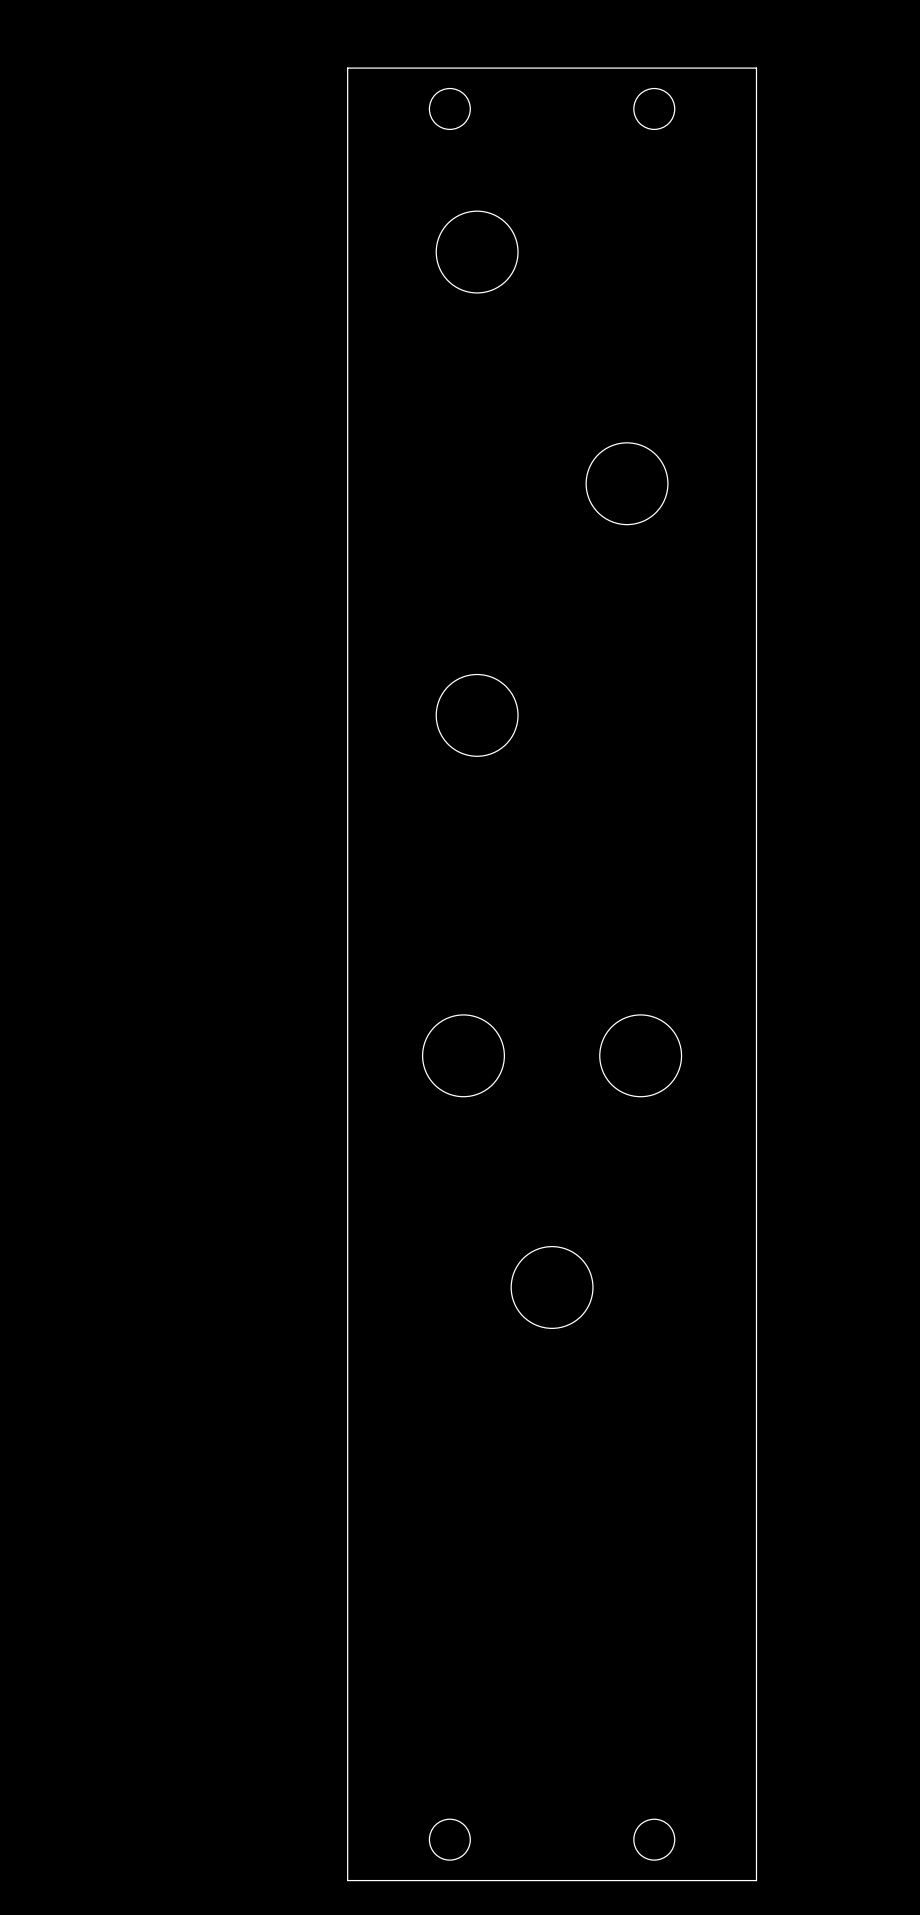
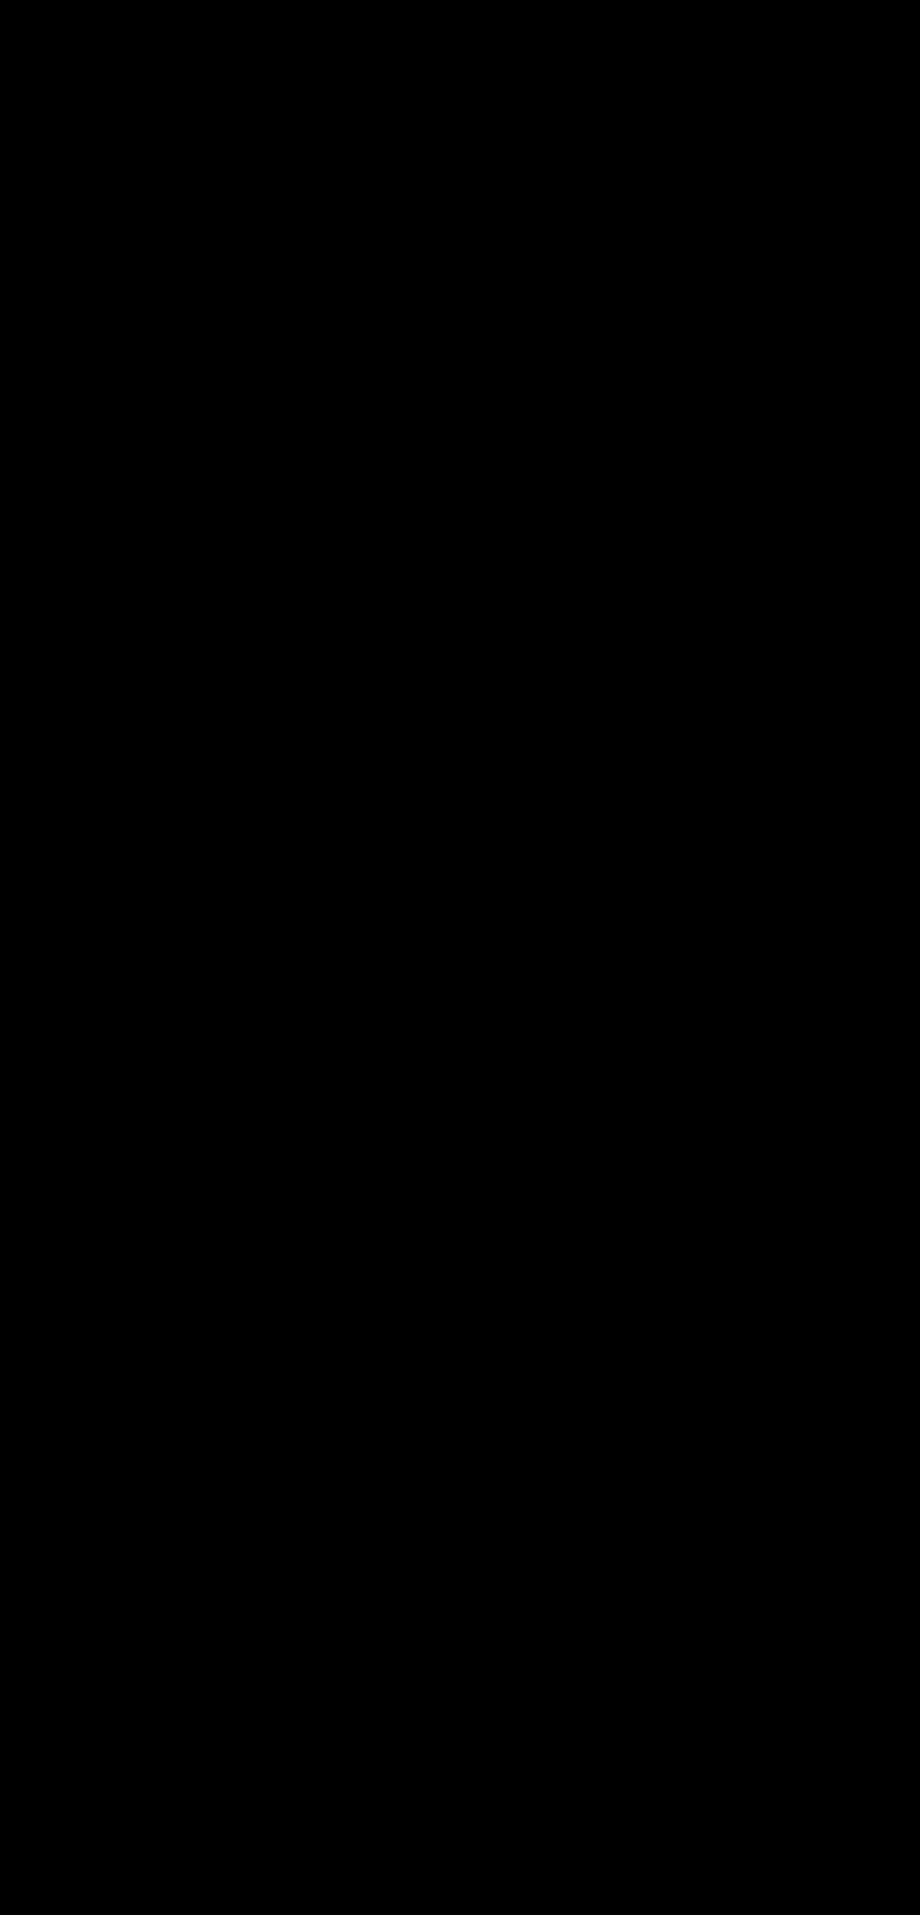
board edge: (756, 68) (756, 1880) (347, 1880) (347, 68) (756, 68) -> none
round board edge: [429, 88, 471, 130] -> none
round board edge: [633, 88, 676, 130] -> none
round board edge: [435, 210, 519, 294] -> none
round board edge: [585, 442, 669, 525] -> none
round board edge: [435, 674, 519, 757] -> none
round board edge: [422, 1014, 505, 1098] -> none
round board edge: [599, 1014, 682, 1098] -> none
round board edge: [510, 1246, 594, 1329] -> none
round board edge: [429, 1818, 471, 1861] -> none
round board edge: [633, 1818, 676, 1861] -> none

